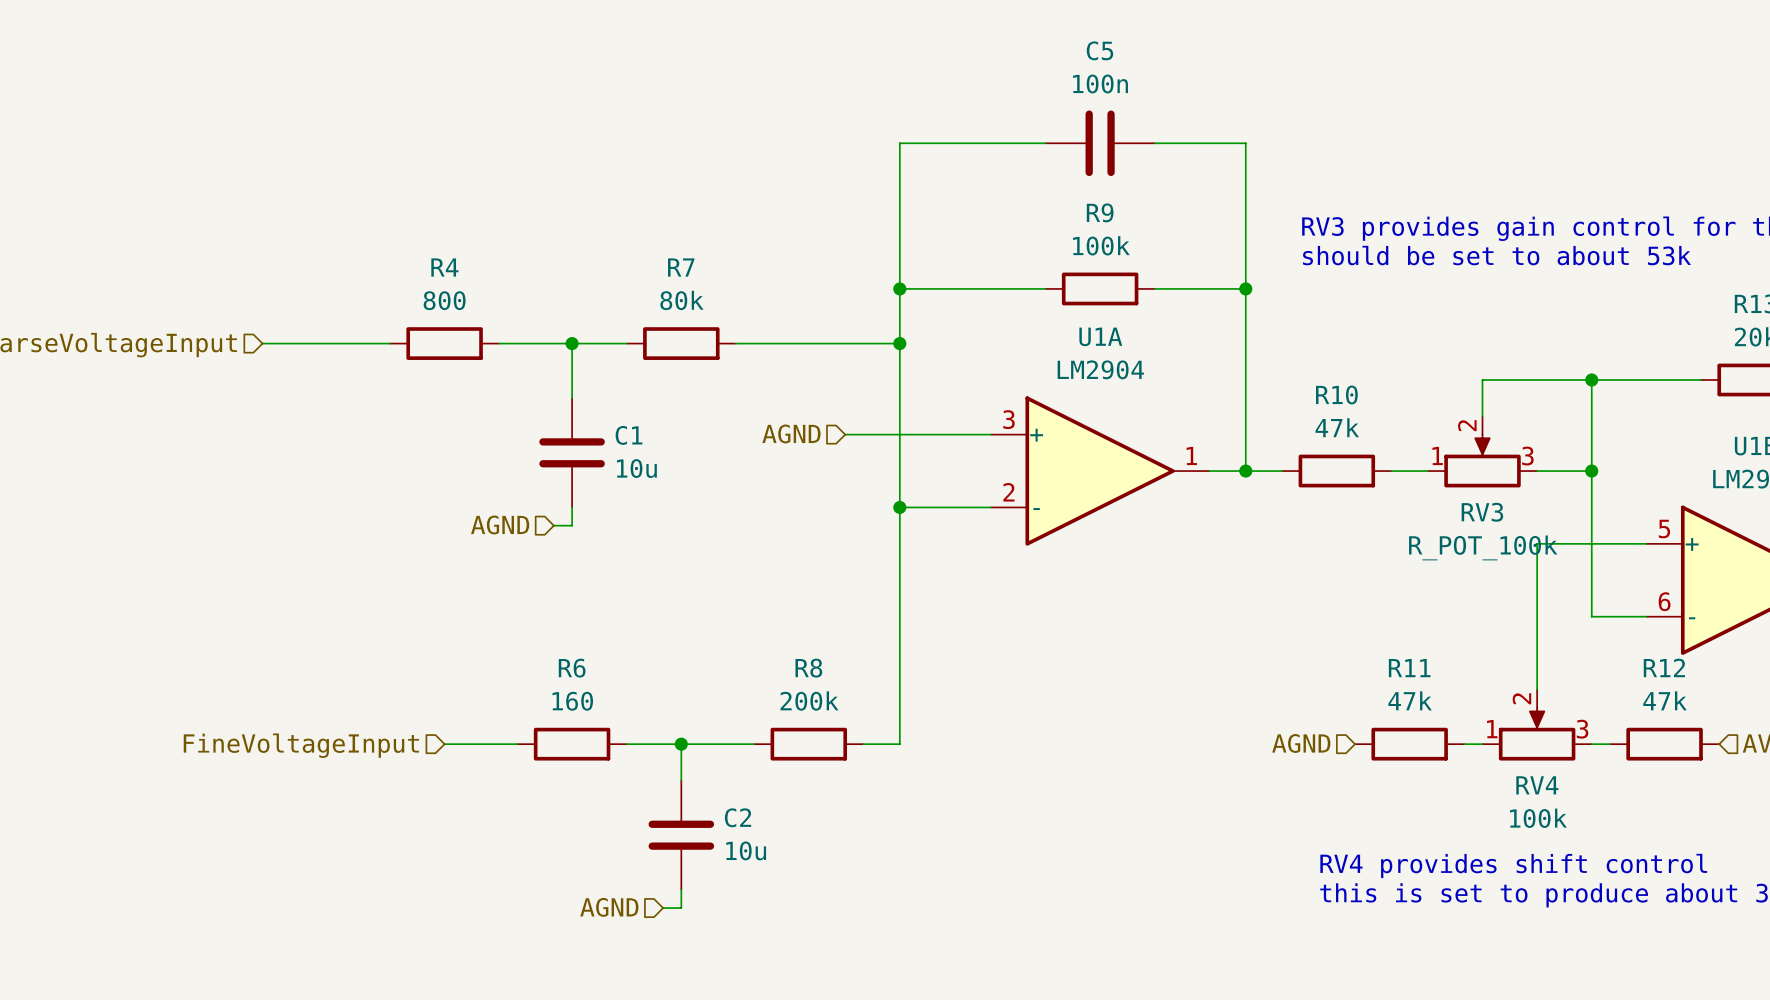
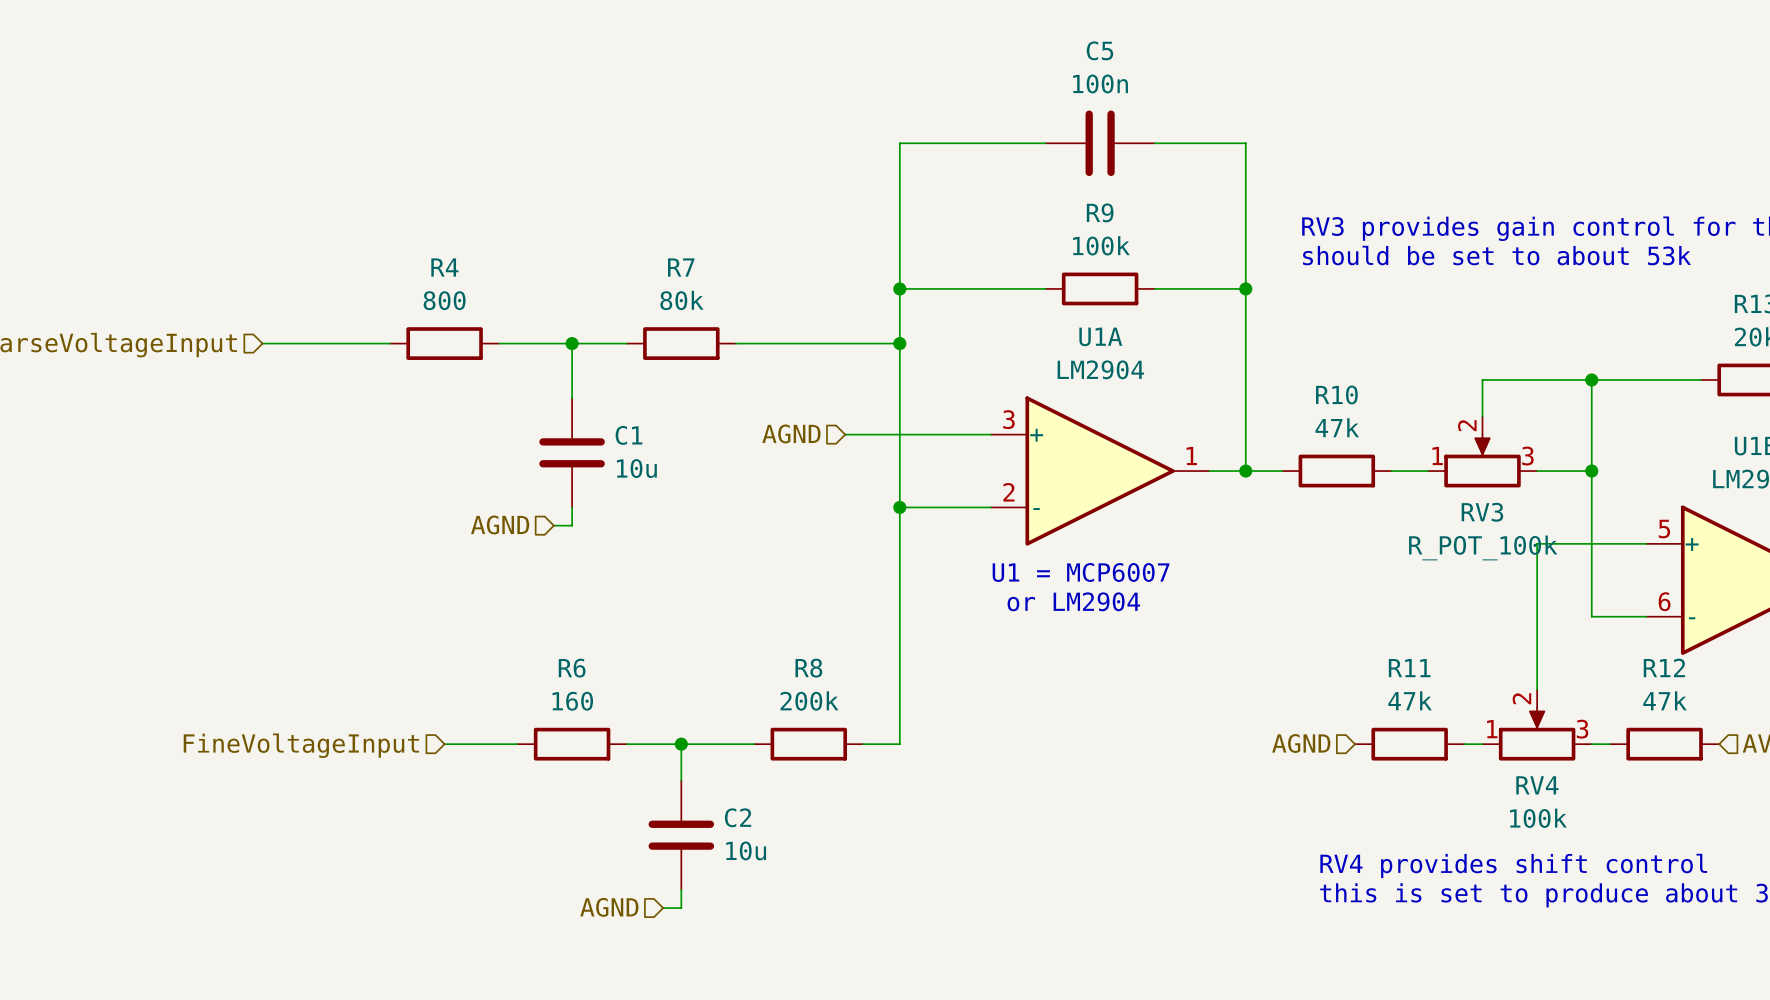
text: none -> U1 = MCP6007 (1081, 572)
text: none -> or LM2904 (1073, 601)

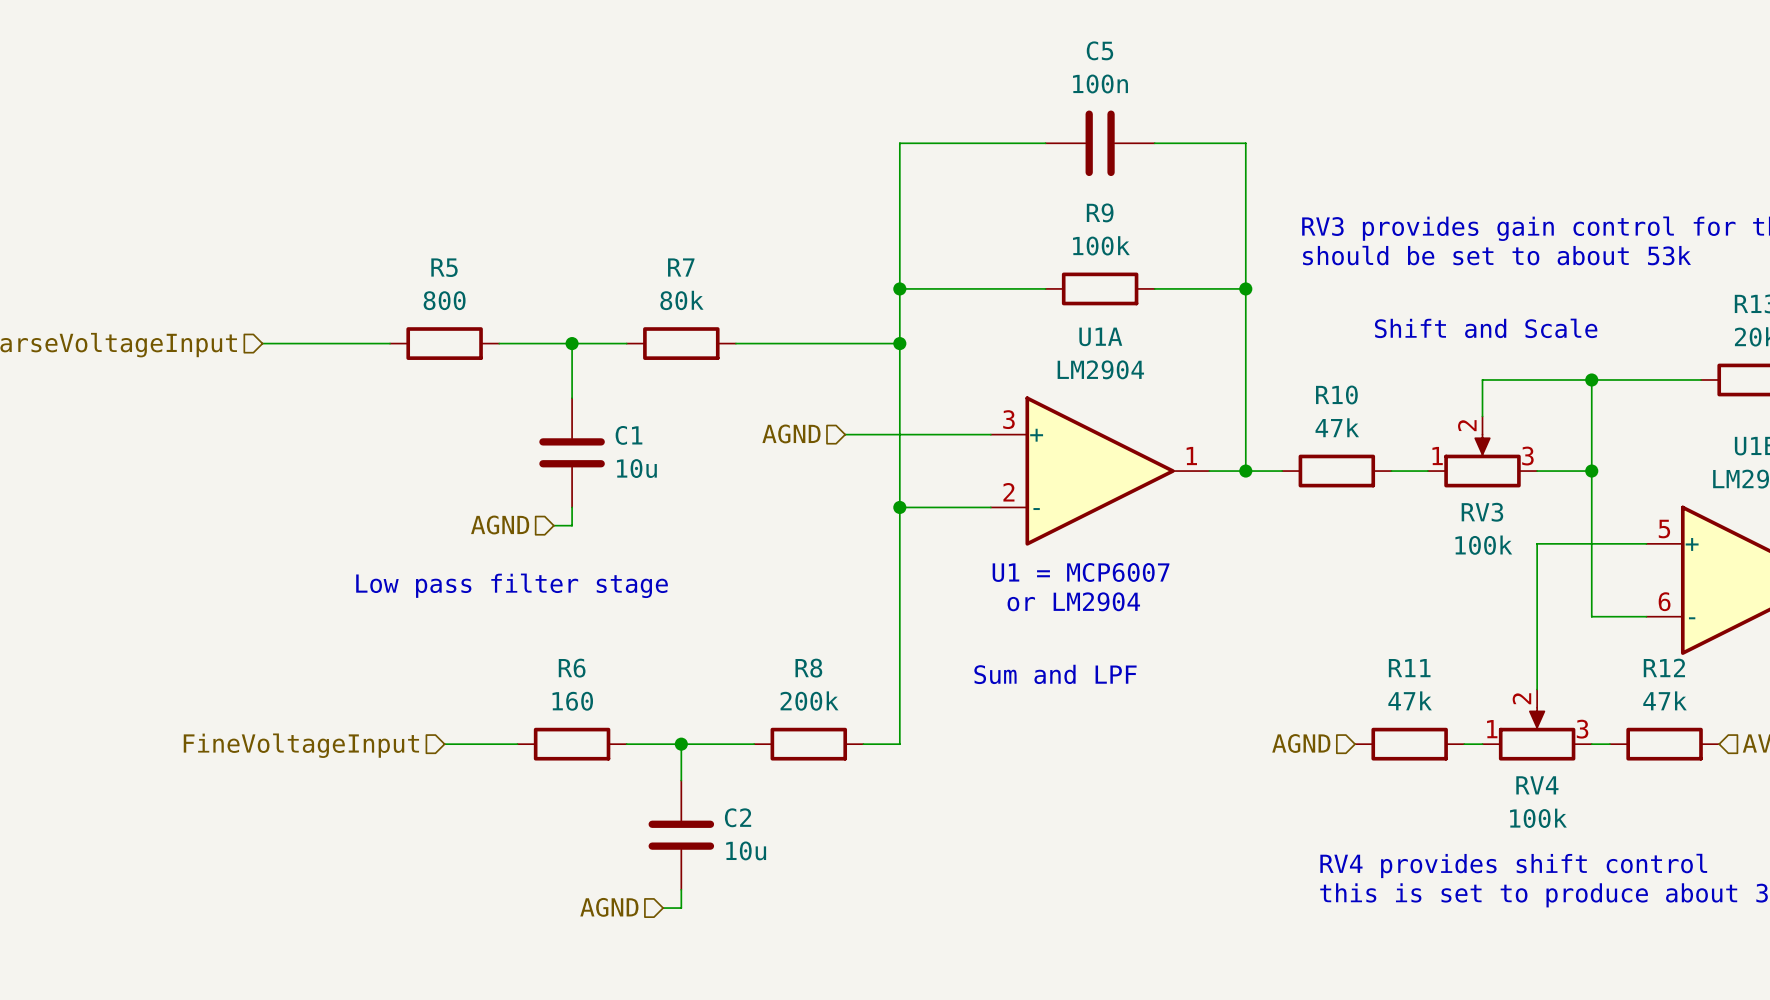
R4 name: R4 (444, 267) -> R5 (444, 267)
text: none -> Shift and Scale (1486, 328)
RV3 value: R_POT_100k (1483, 547) -> 100k (1483, 545)
text: none -> Low pass filter stage (512, 585)
text: none -> Sum and LPF (1055, 674)

